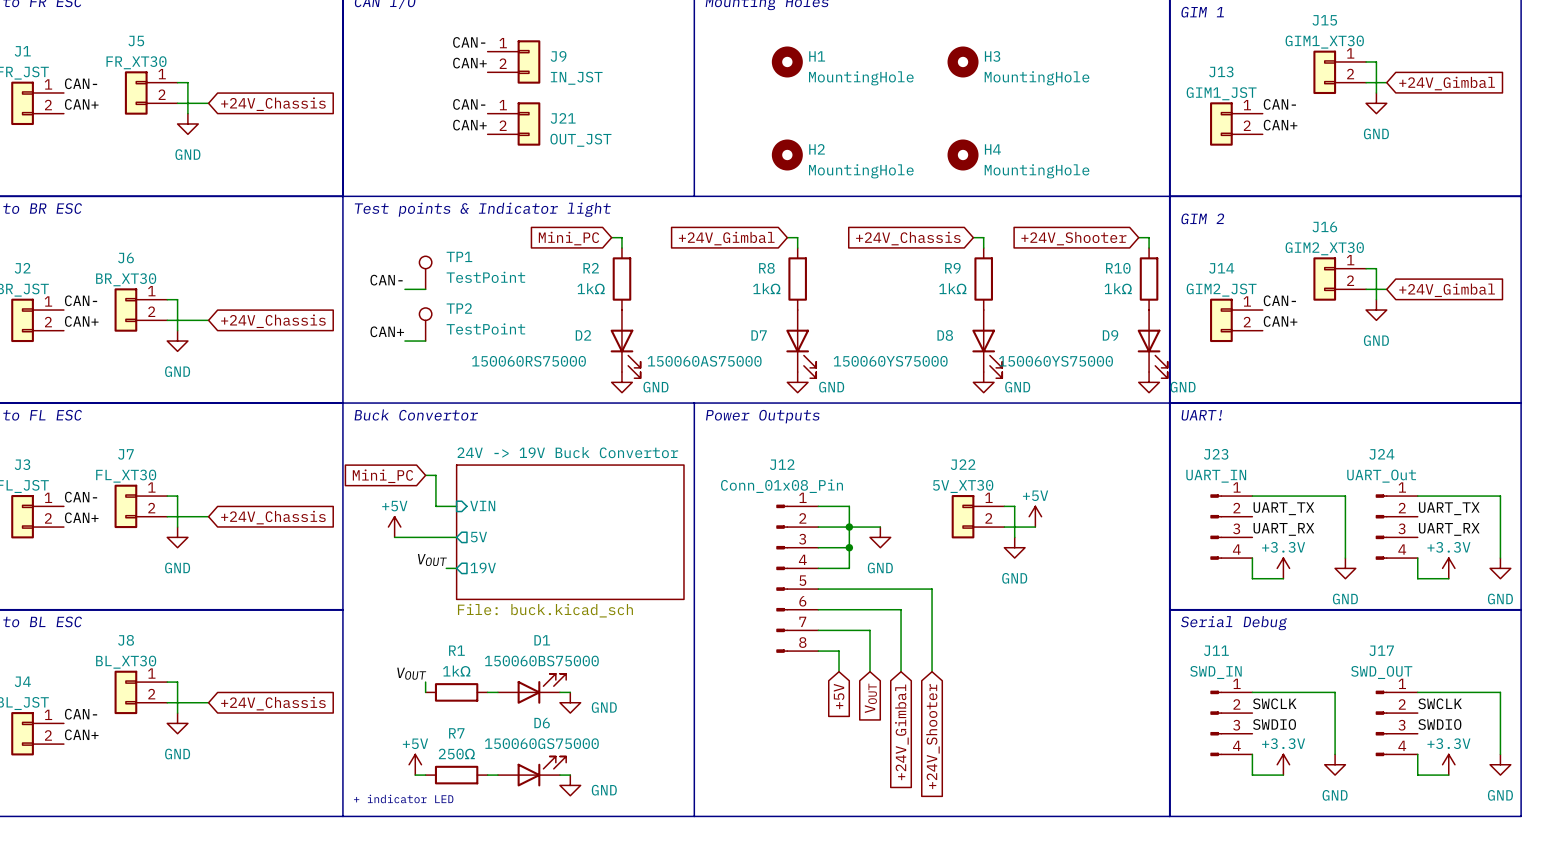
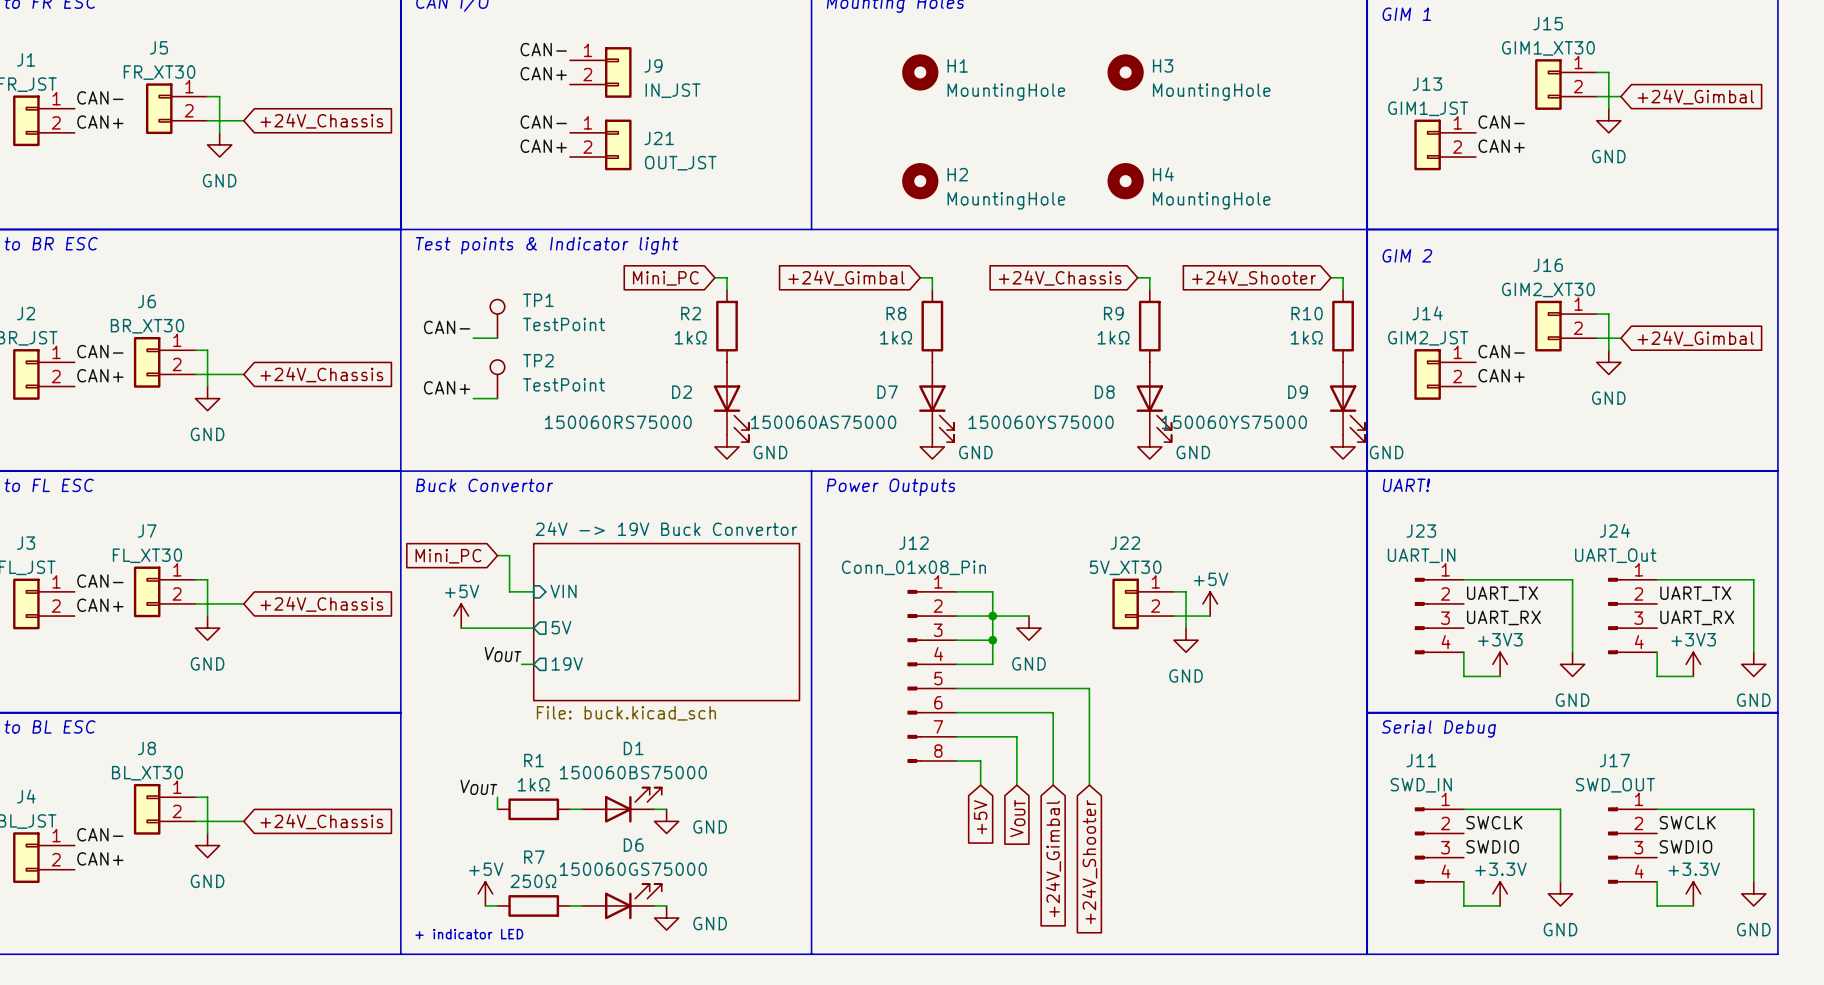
power symbol: +3.3V (1283, 568) -> +3V3 (1500, 664)
power symbol: +3.3V (1448, 568) -> +3V3 (1693, 664)

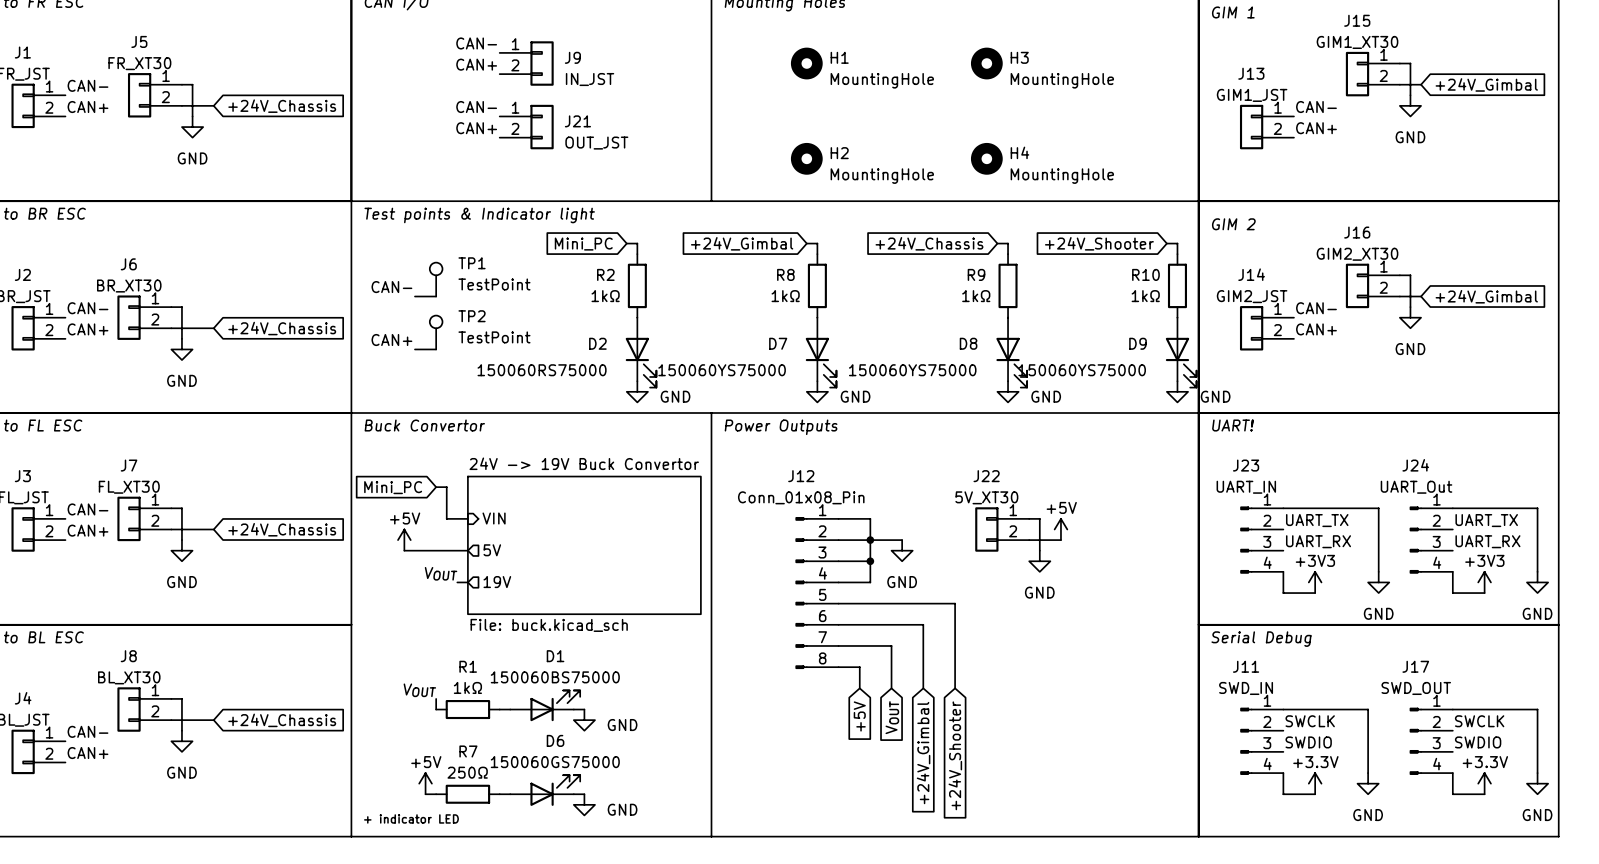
D7 value: 150060AS75000 (823, 422) -> 150060YS75000 (722, 370)

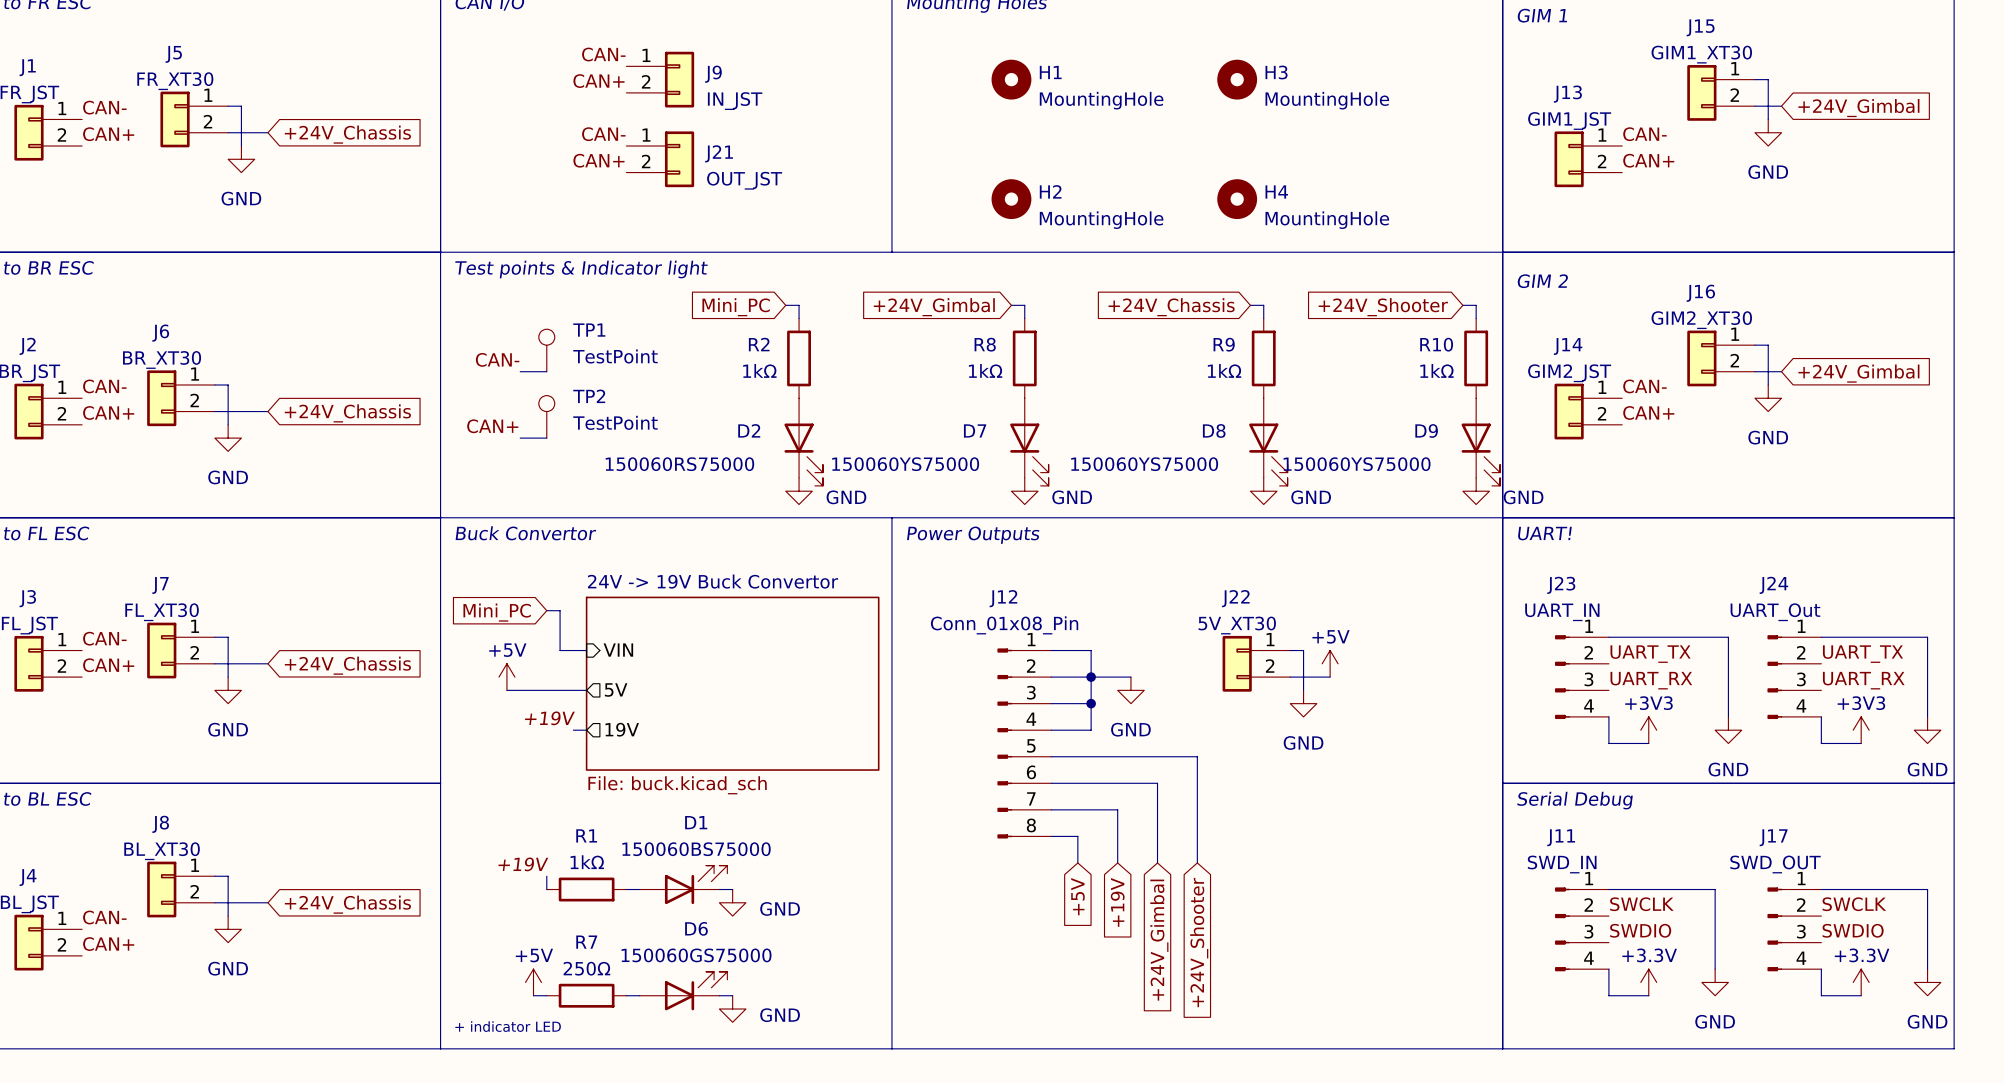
label: VOUT (441, 573) -> +19V (549, 718)
label: VOUT (419, 690) -> +19V (523, 864)
global label: VOUT (892, 717) -> +19V (1117, 902)

